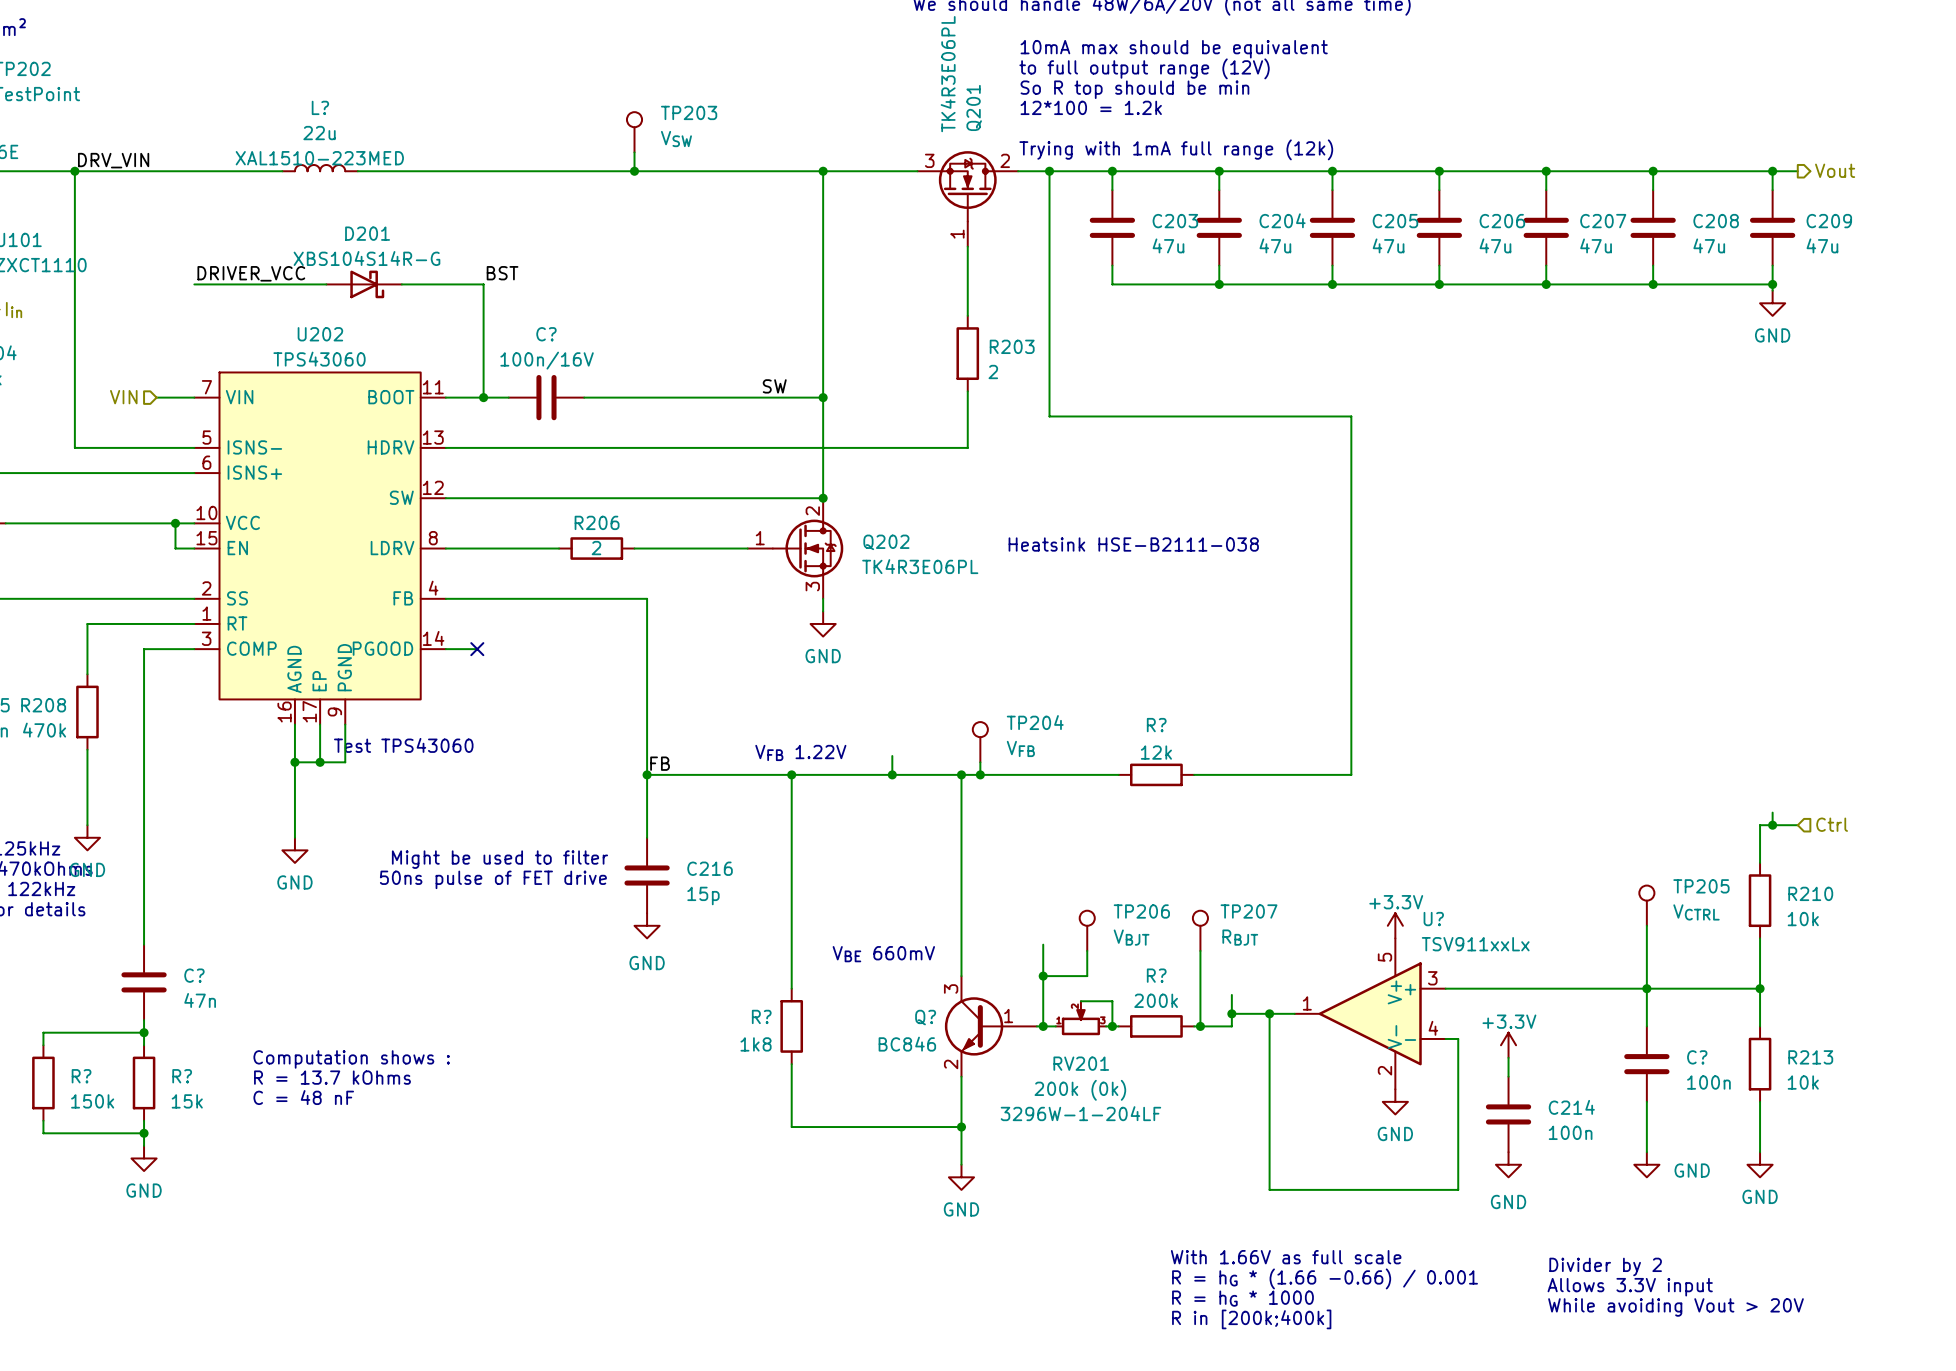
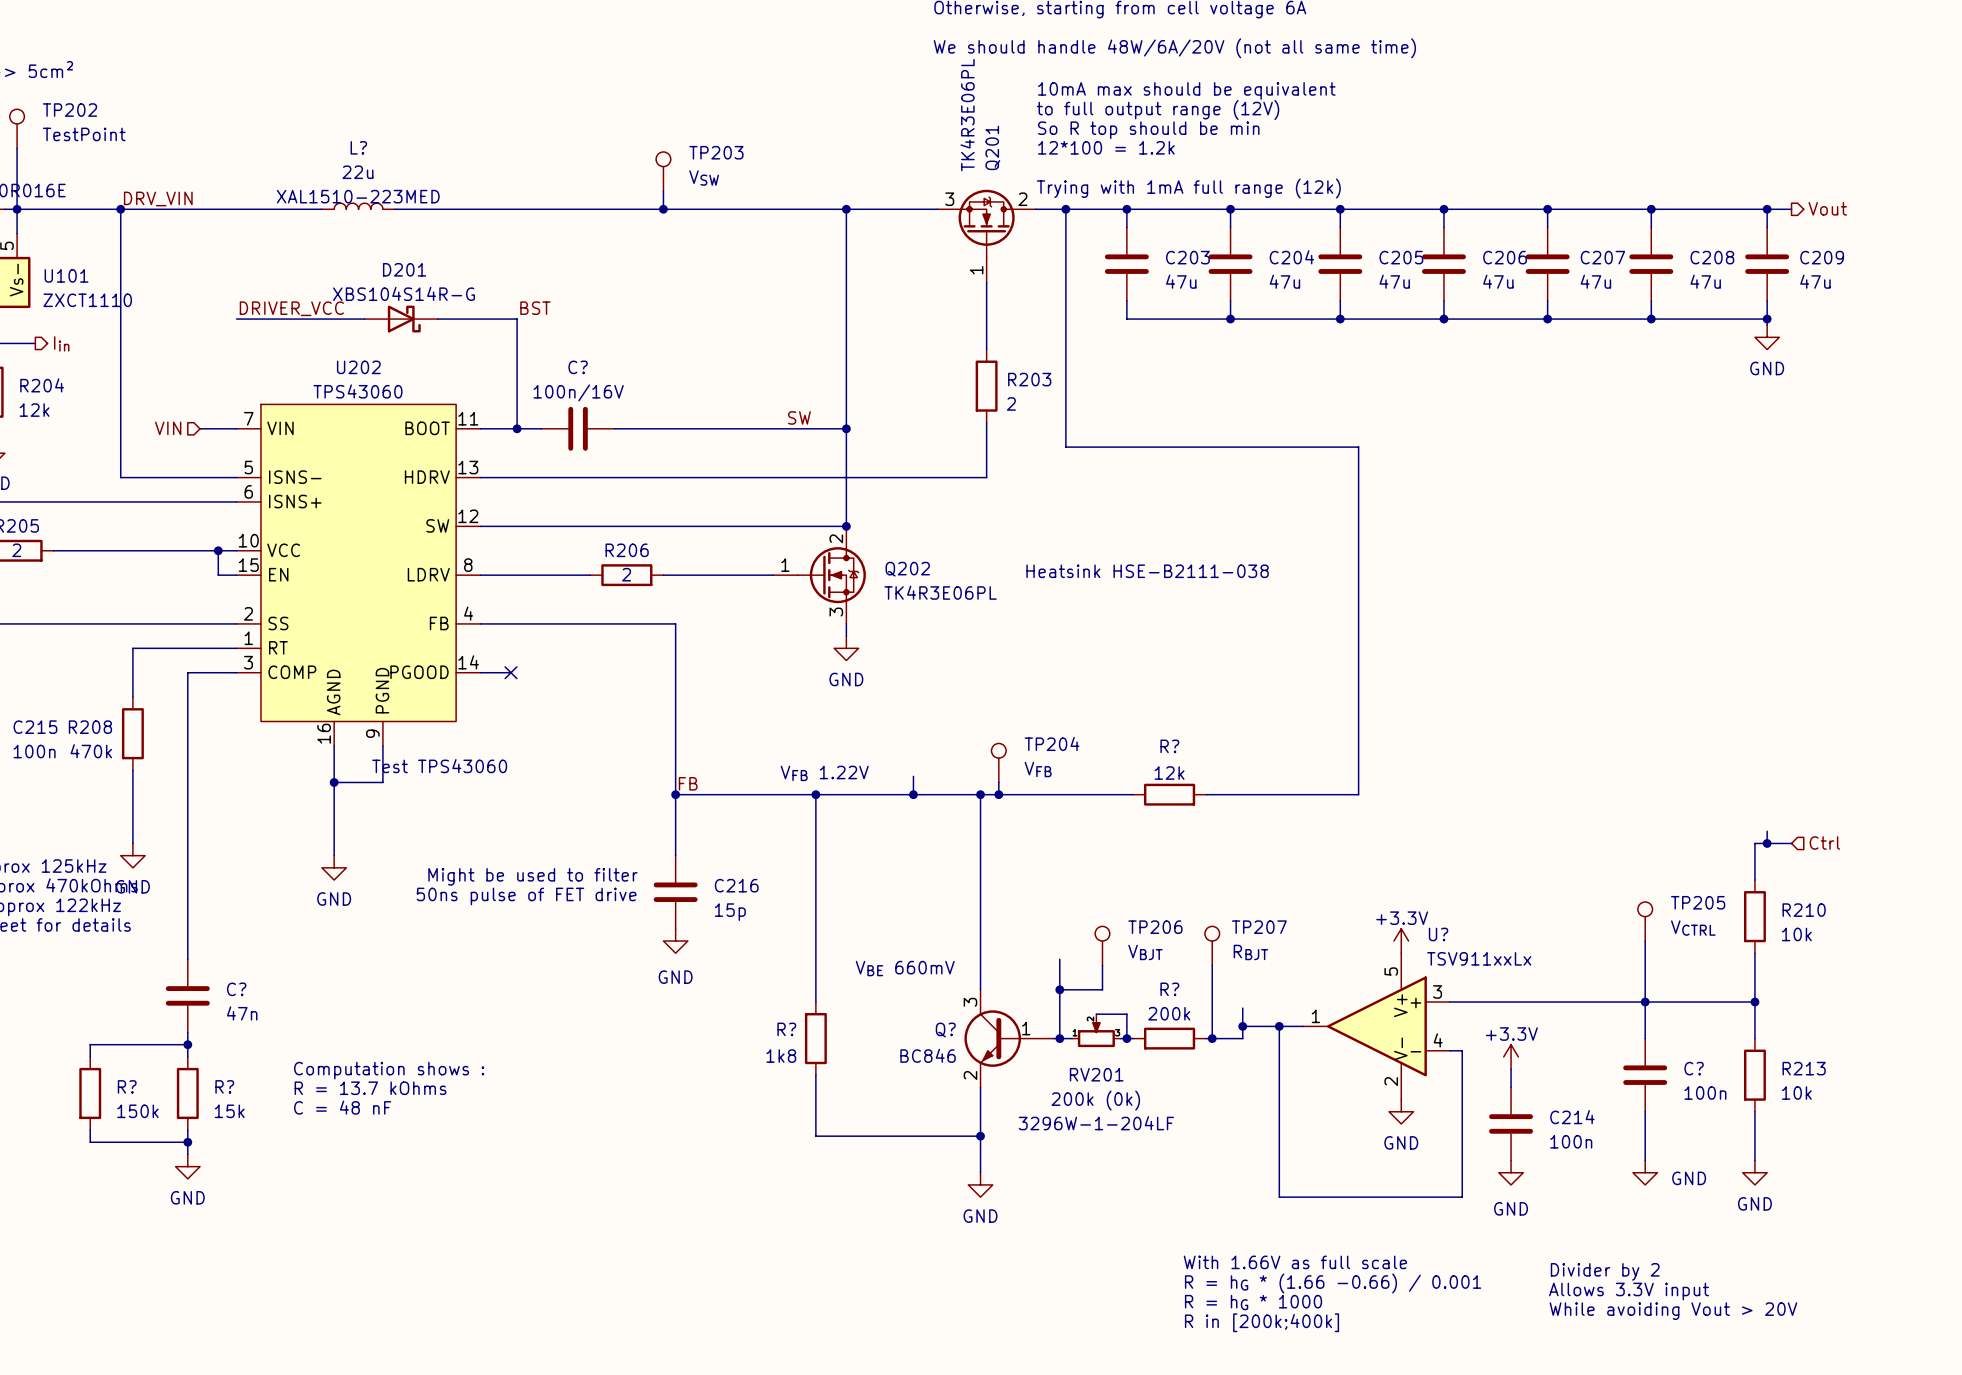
U202 symbol: [194, 372, 446, 725] -> [236, 404, 481, 746]
wire: (320, 724) (320, 762) -> none
junction: (320, 762) -> none

